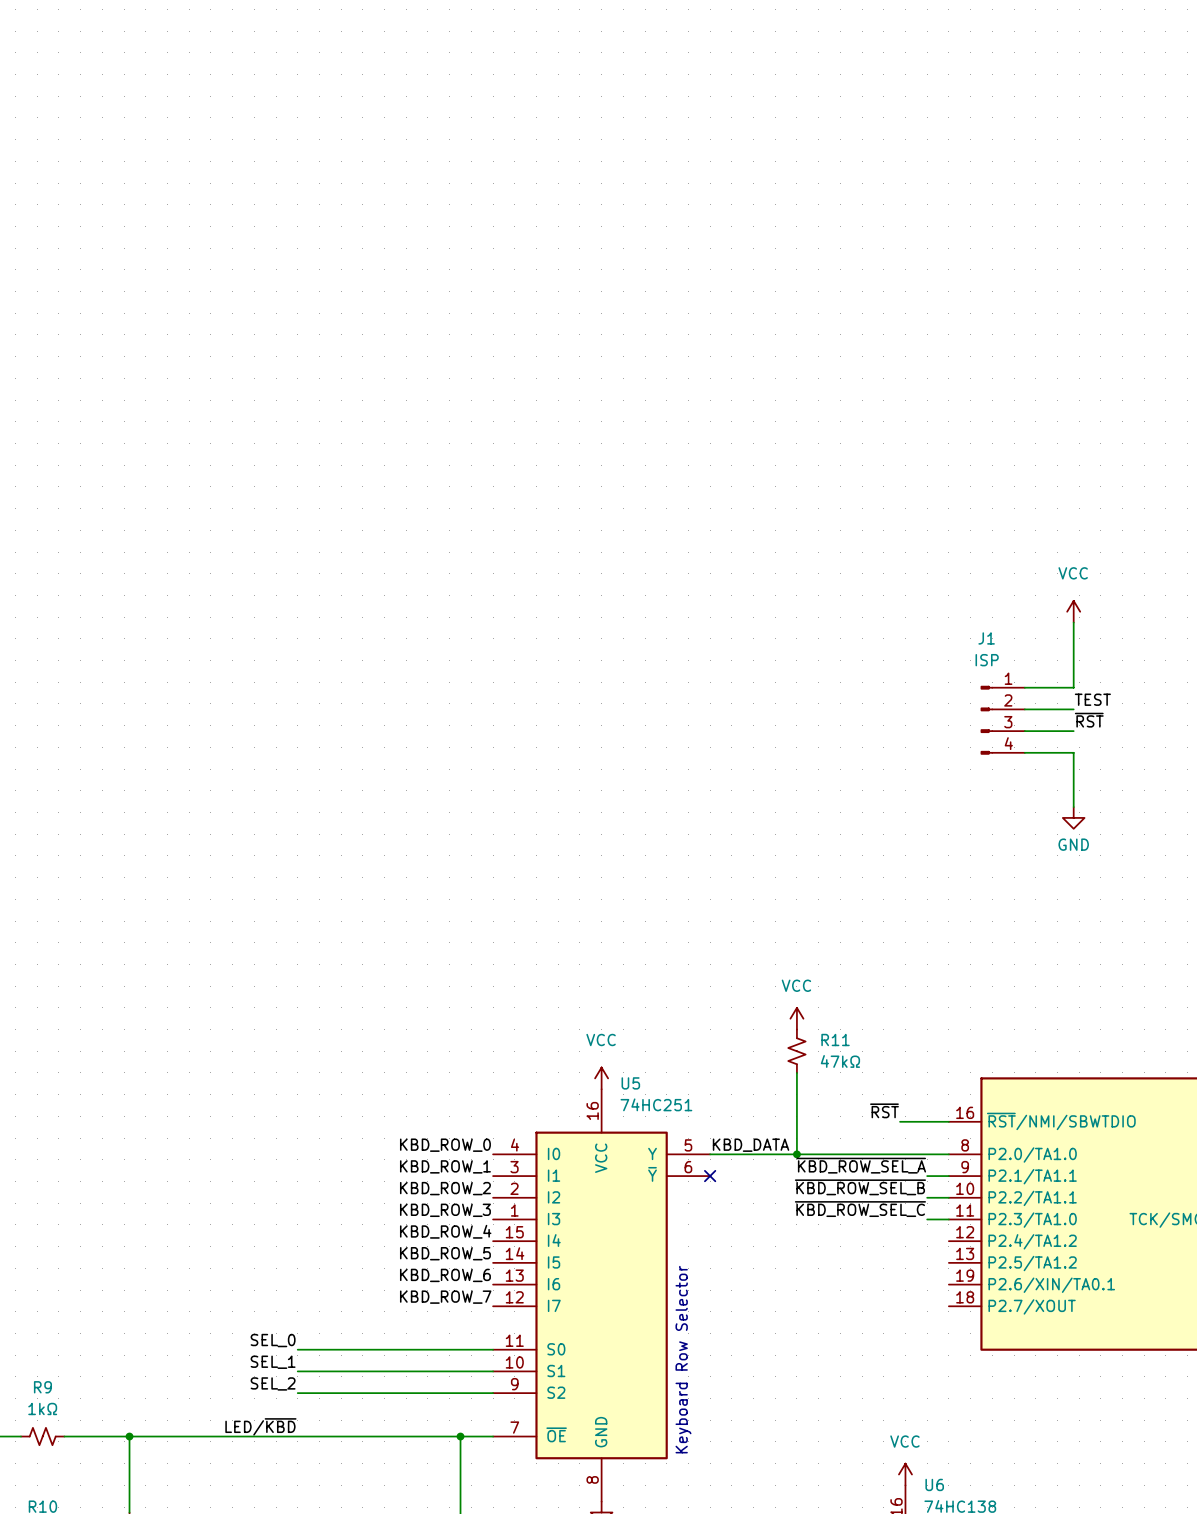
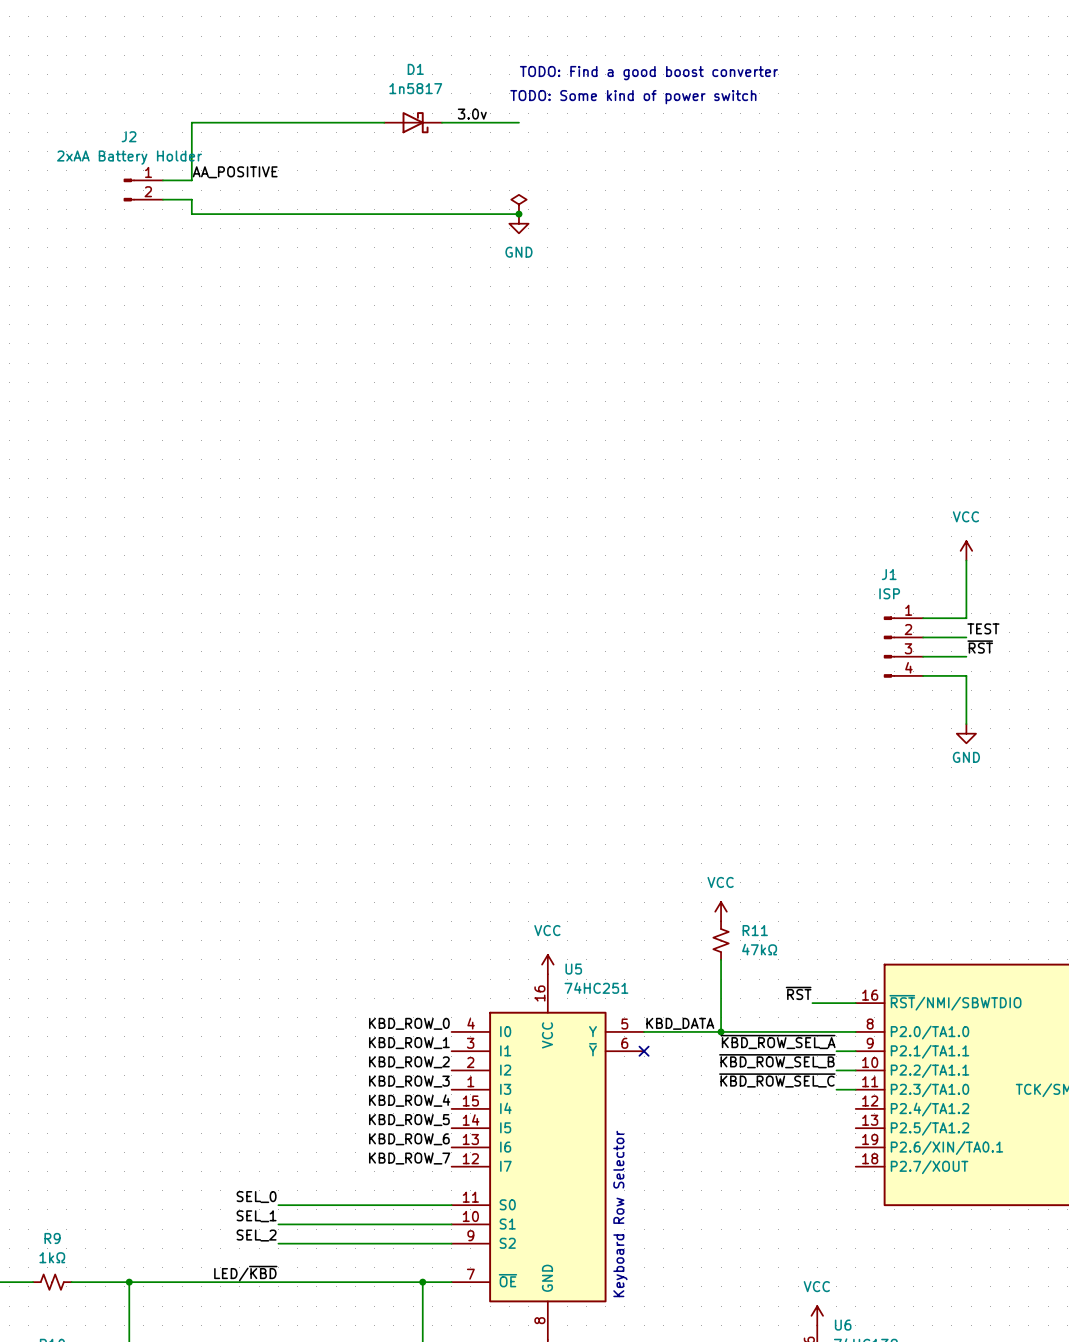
text: none -> TODO: Find a good boost converter (648, 73)
text: none -> TODO: Some kind of power switch (633, 97)
label: none -> 3.0v (472, 114)
wire: none -> (384, 122) (191, 122) (191, 180) (162, 180)
D1: none -> 1n5817 (413, 122)
wire: none -> (441, 122) (518, 122)
label: none -> AA_POSITIVE (235, 172)
J2: none -> 2xAA Battery Holder (143, 190)
wire: none -> (162, 199) (191, 199) (191, 214) (518, 214)
power symbol: none -> (518, 204)
junction: none -> (518, 214)
power symbol: none -> GND (518, 223)

